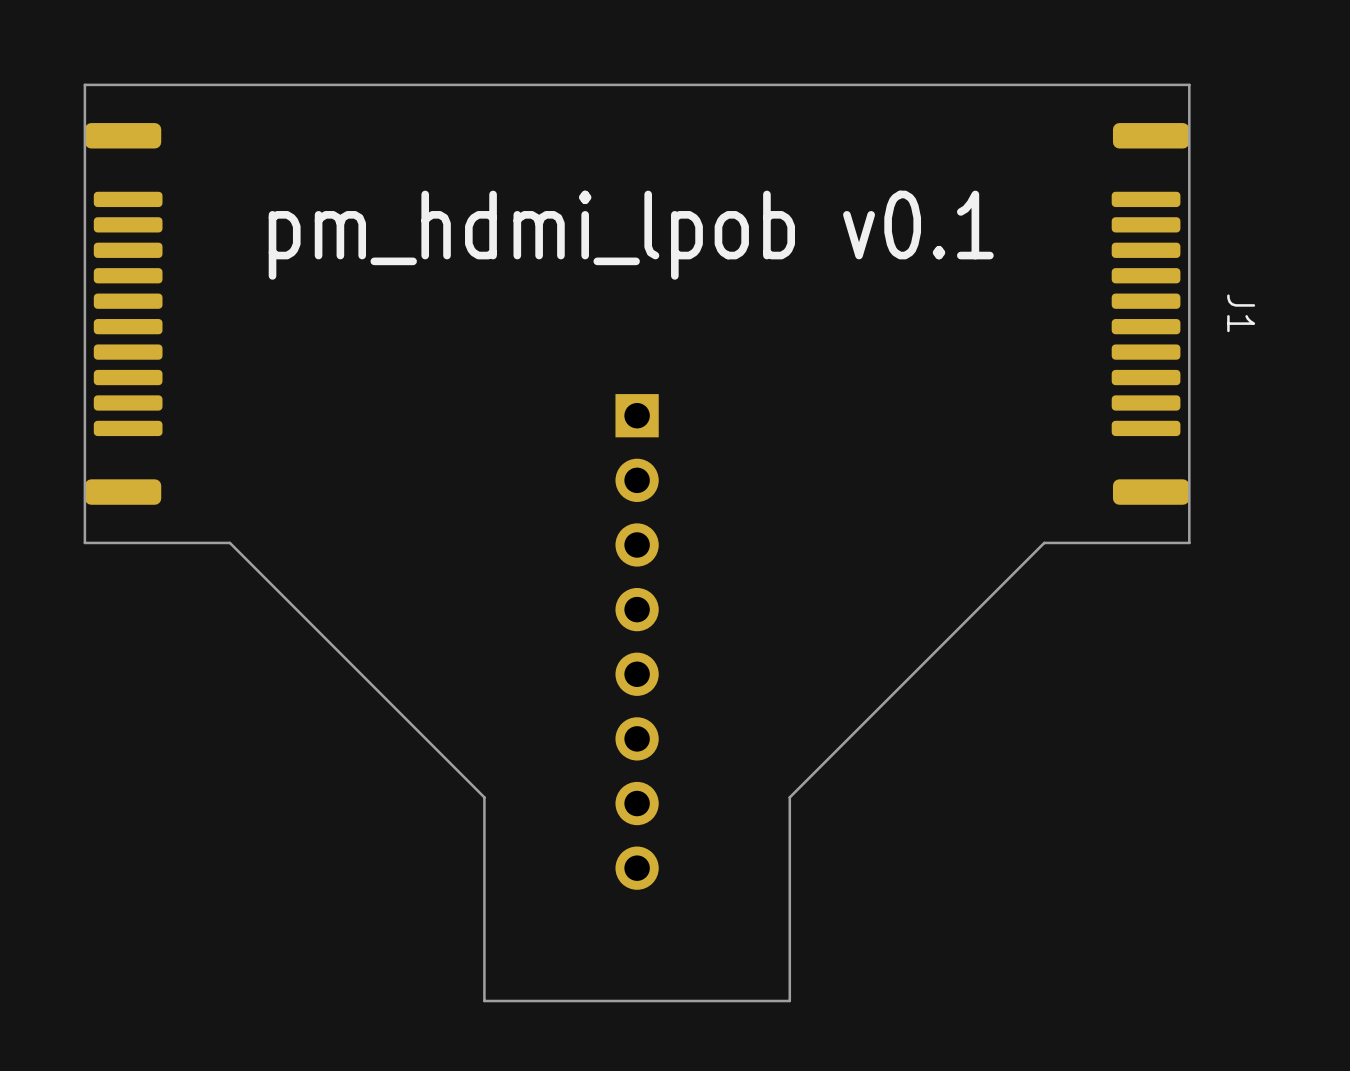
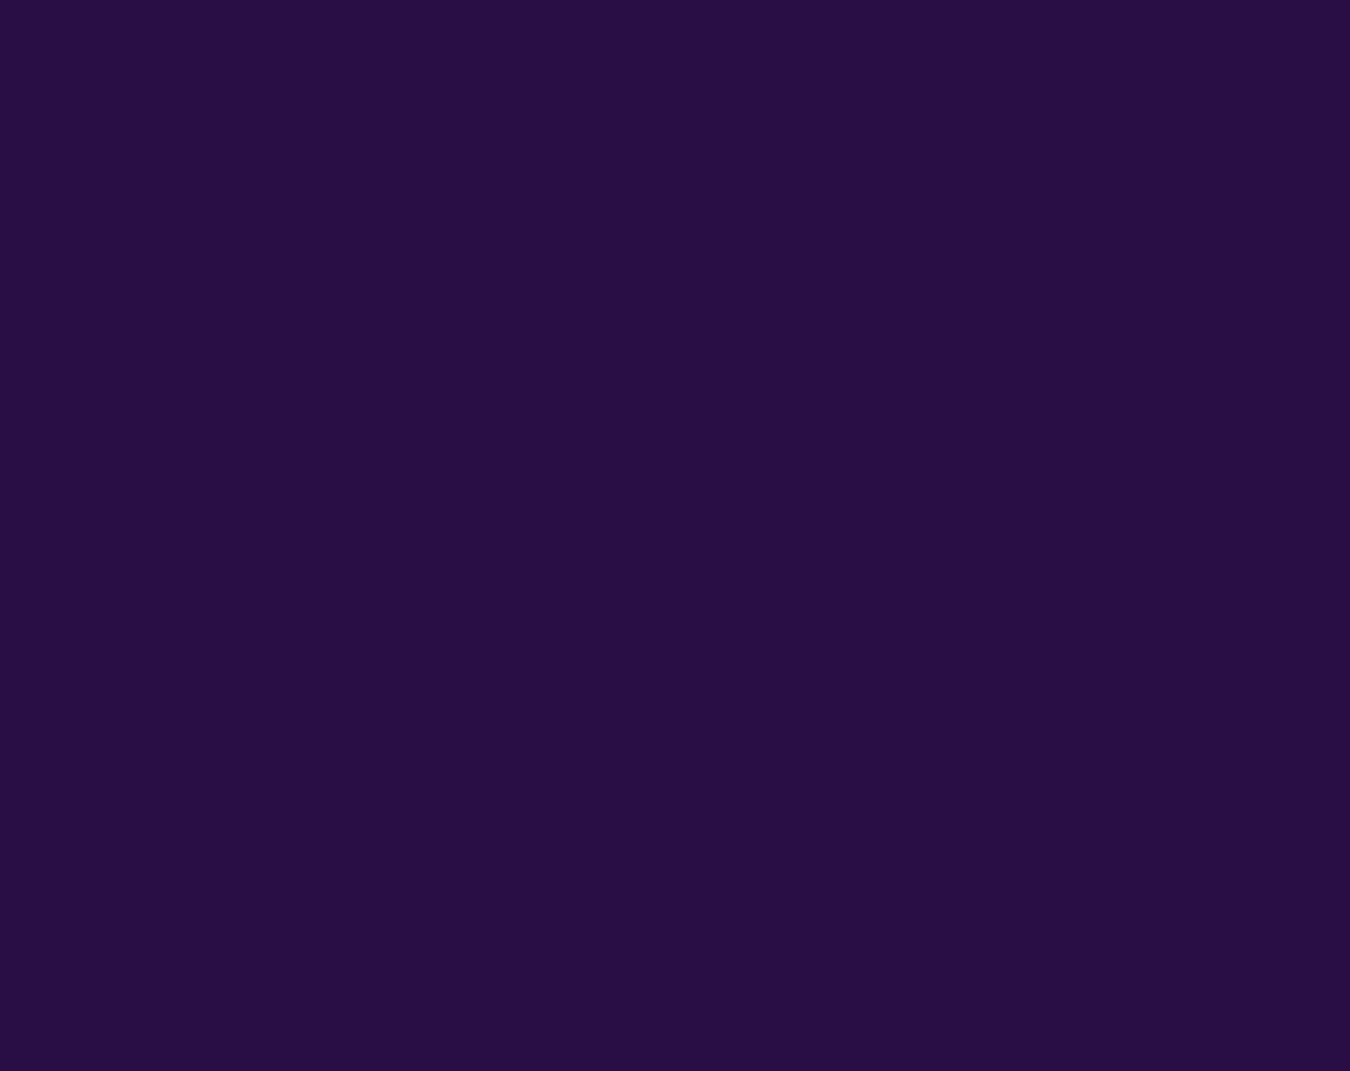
board edge: (1189, 84) (84, 84) (84, 542) (229, 542) (484, 797) (484, 1001) (789, 1001) (789, 797) (1044, 542) (1189, 542) (1189, 84) -> none
text: pm_hdmi_lpob v0.1 (631, 235) -> none
part: (123, 313) -> none
J1: (1150, 313) -> none
part: (637, 641) -> none

